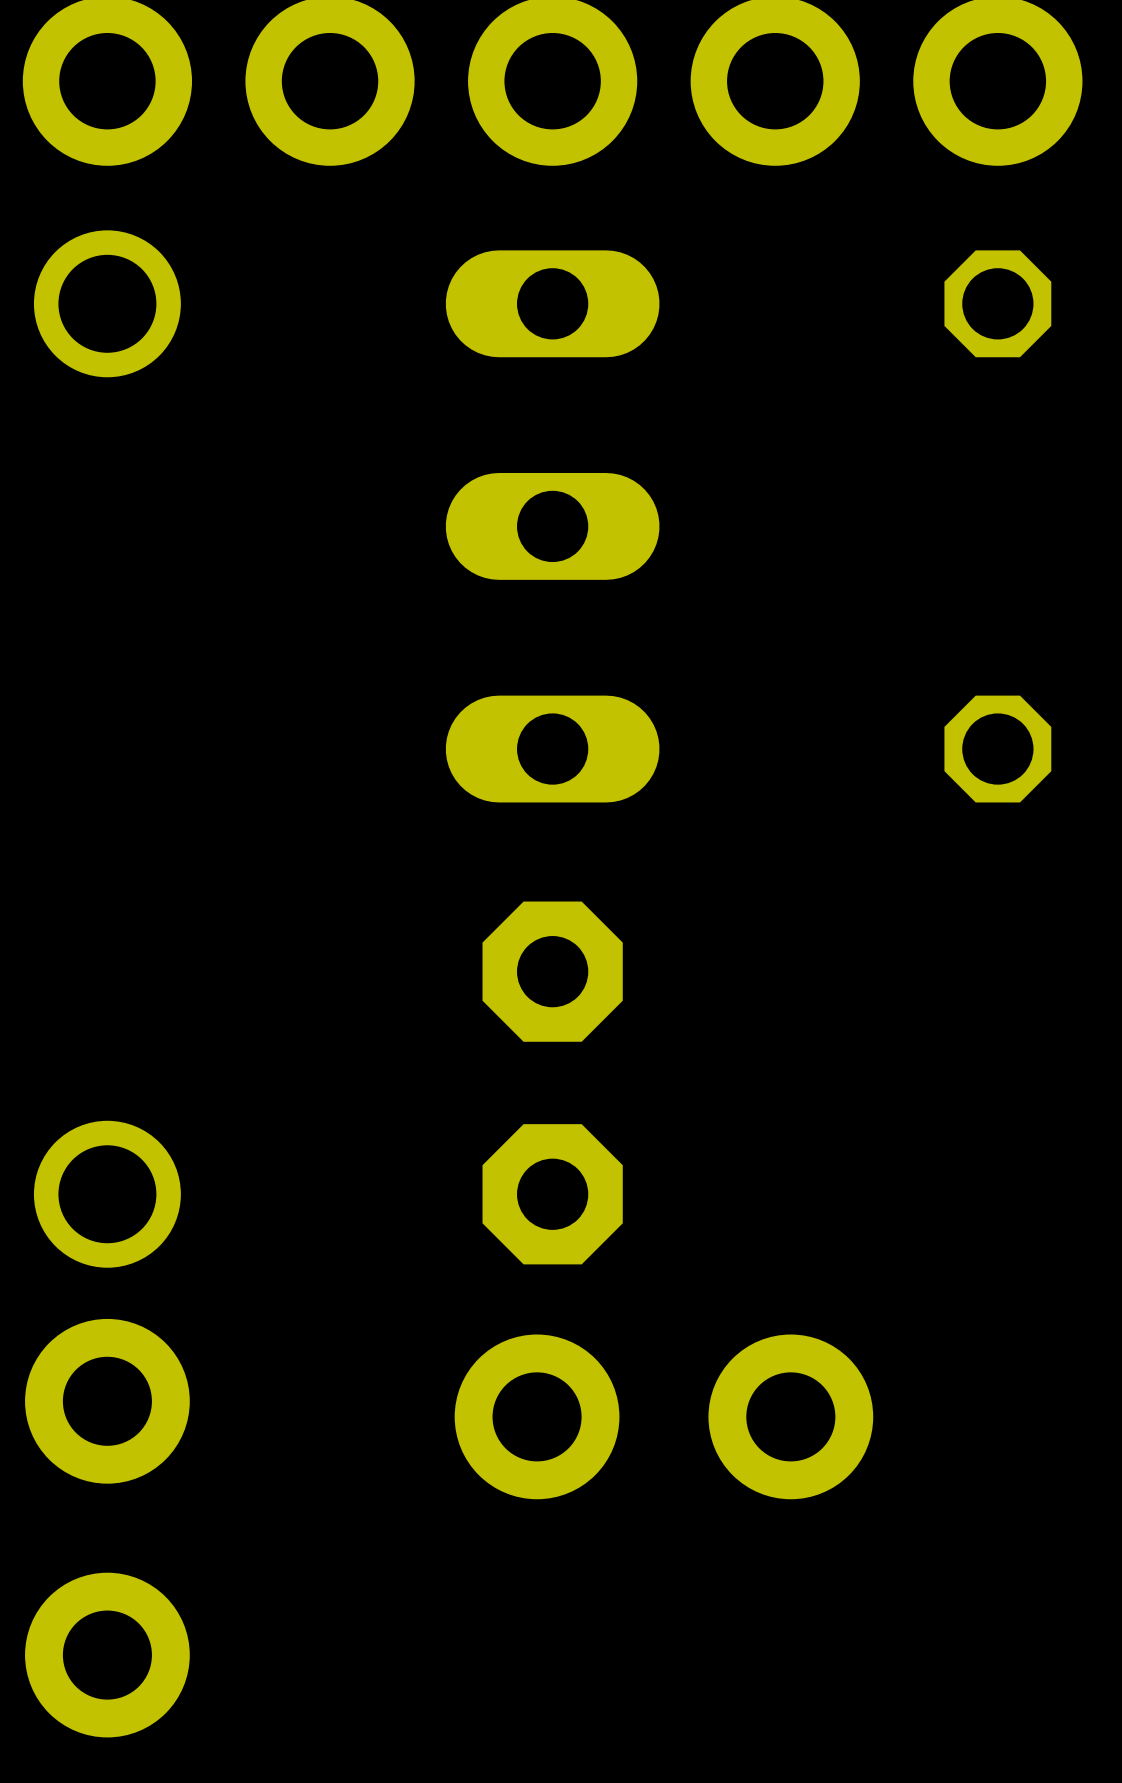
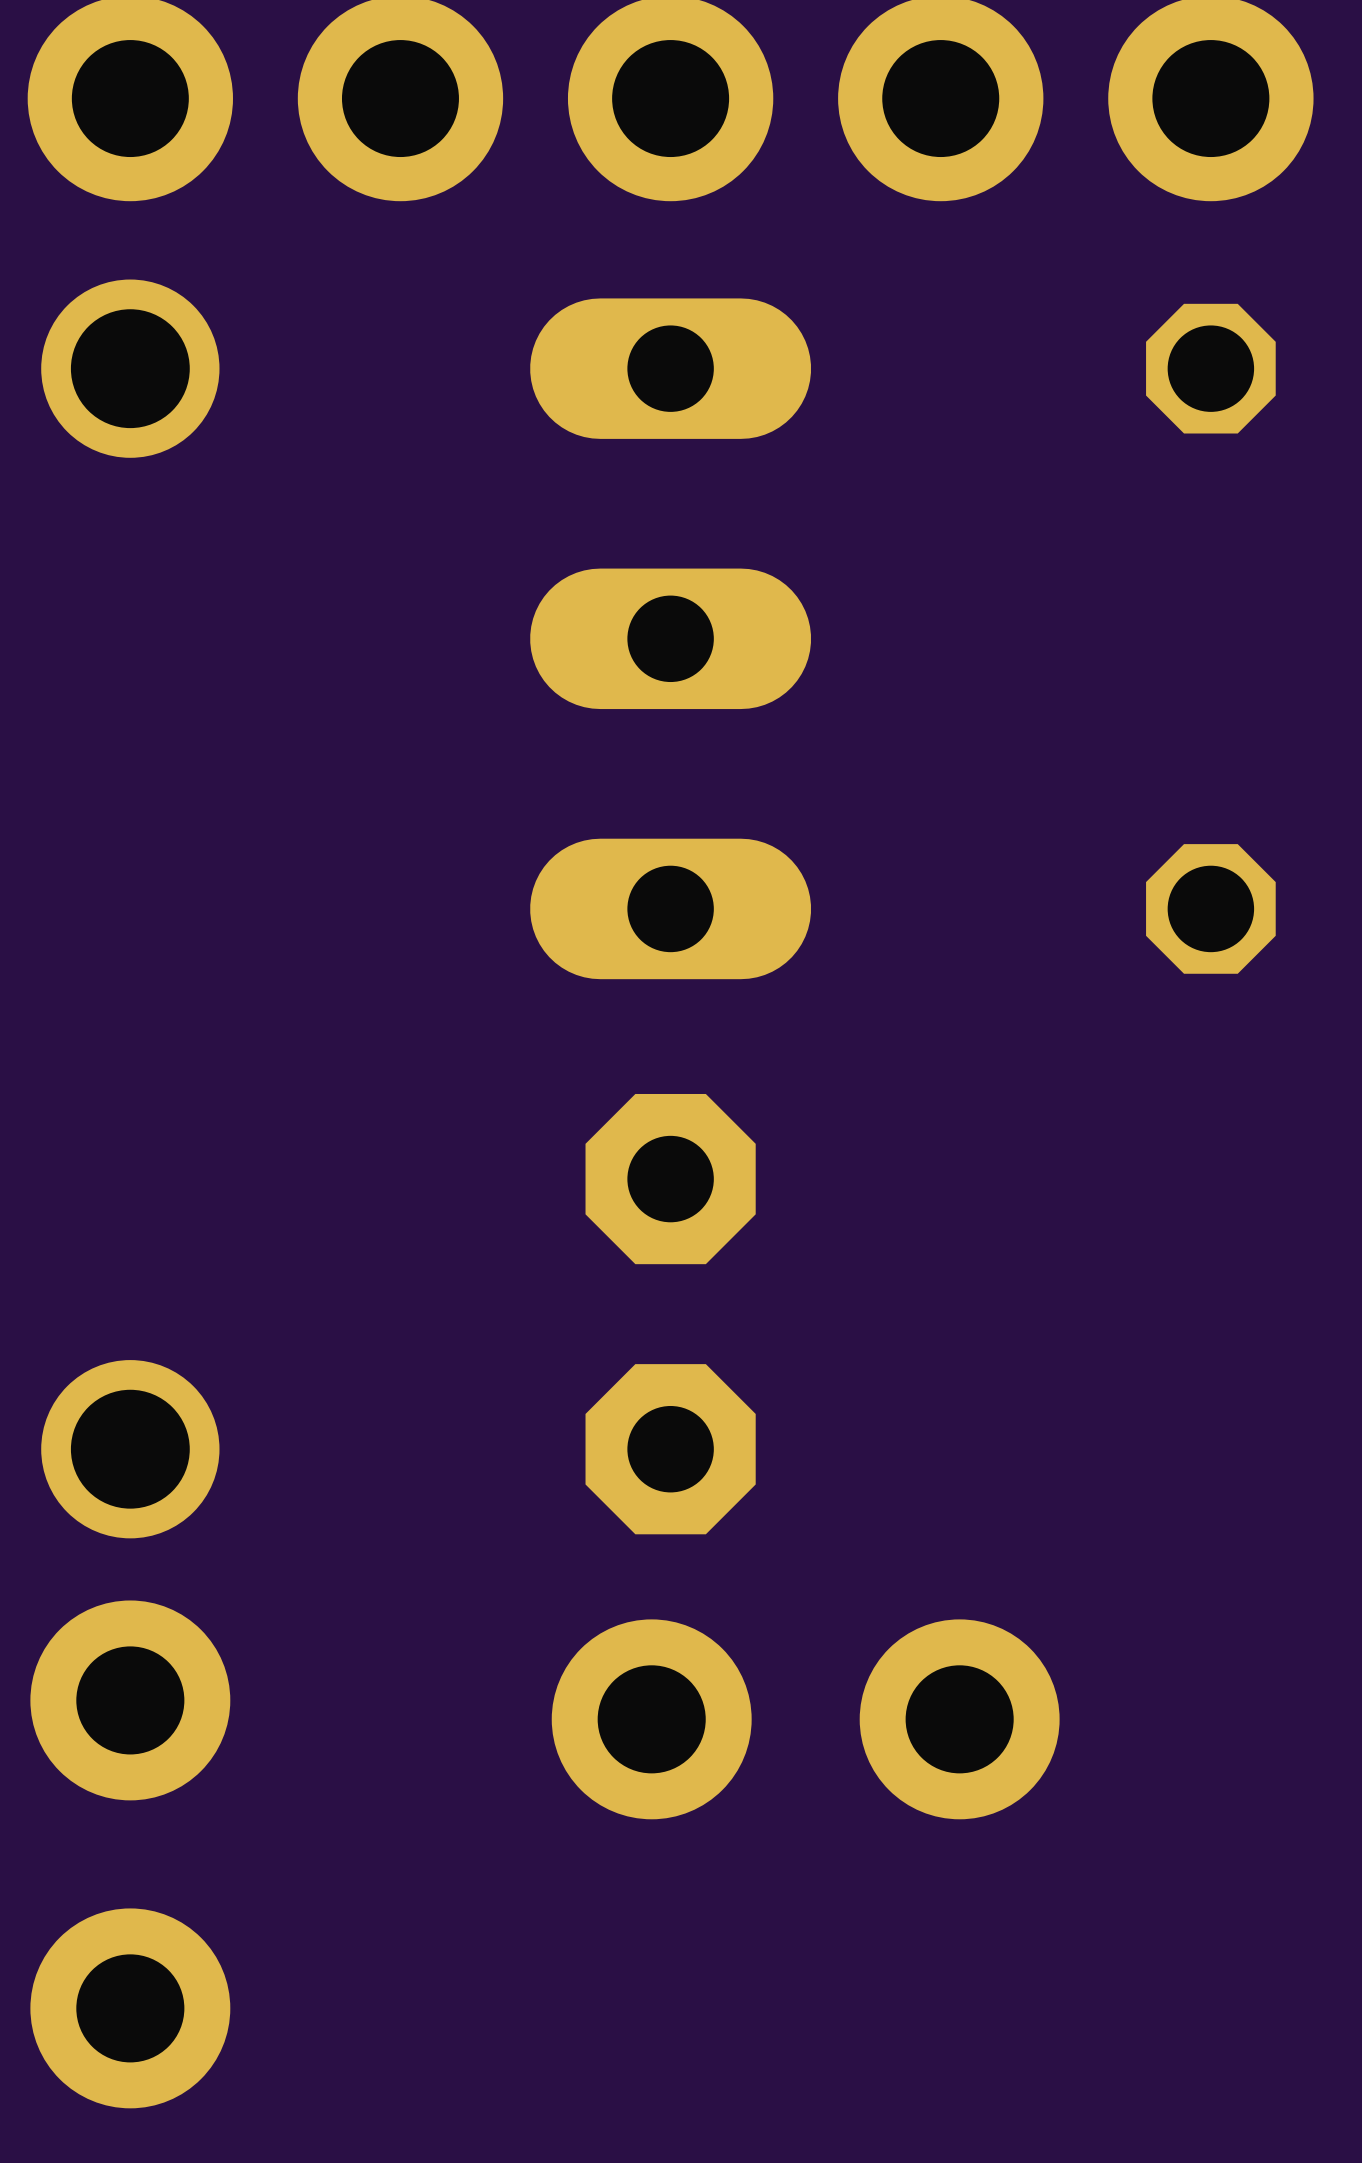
part footprint: [445, 250, 660, 803] -> [530, 298, 812, 980]

